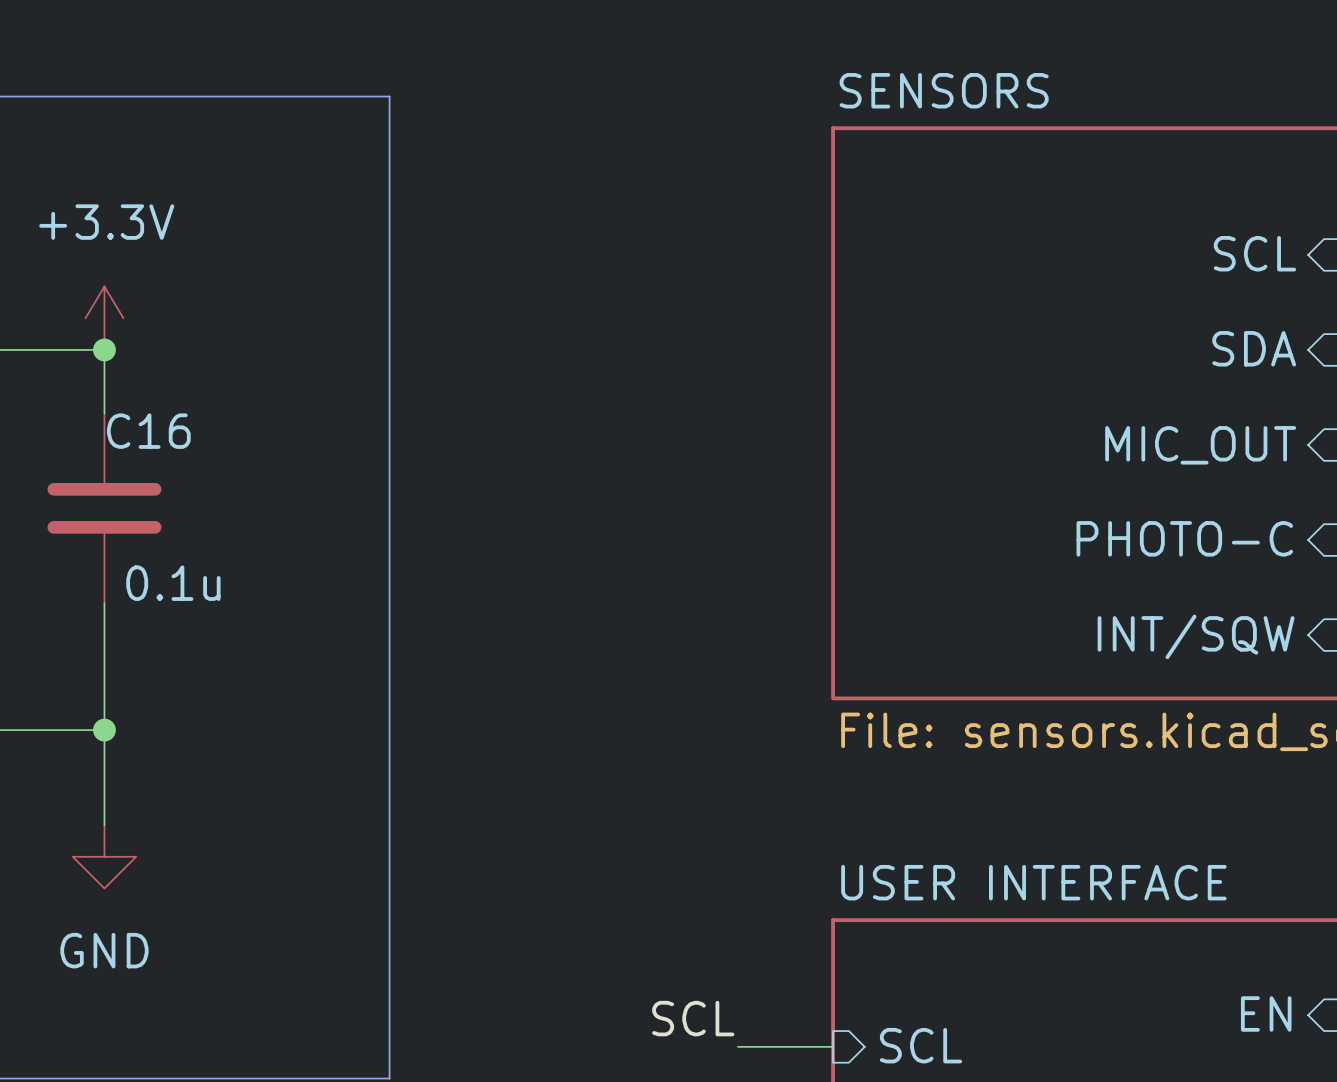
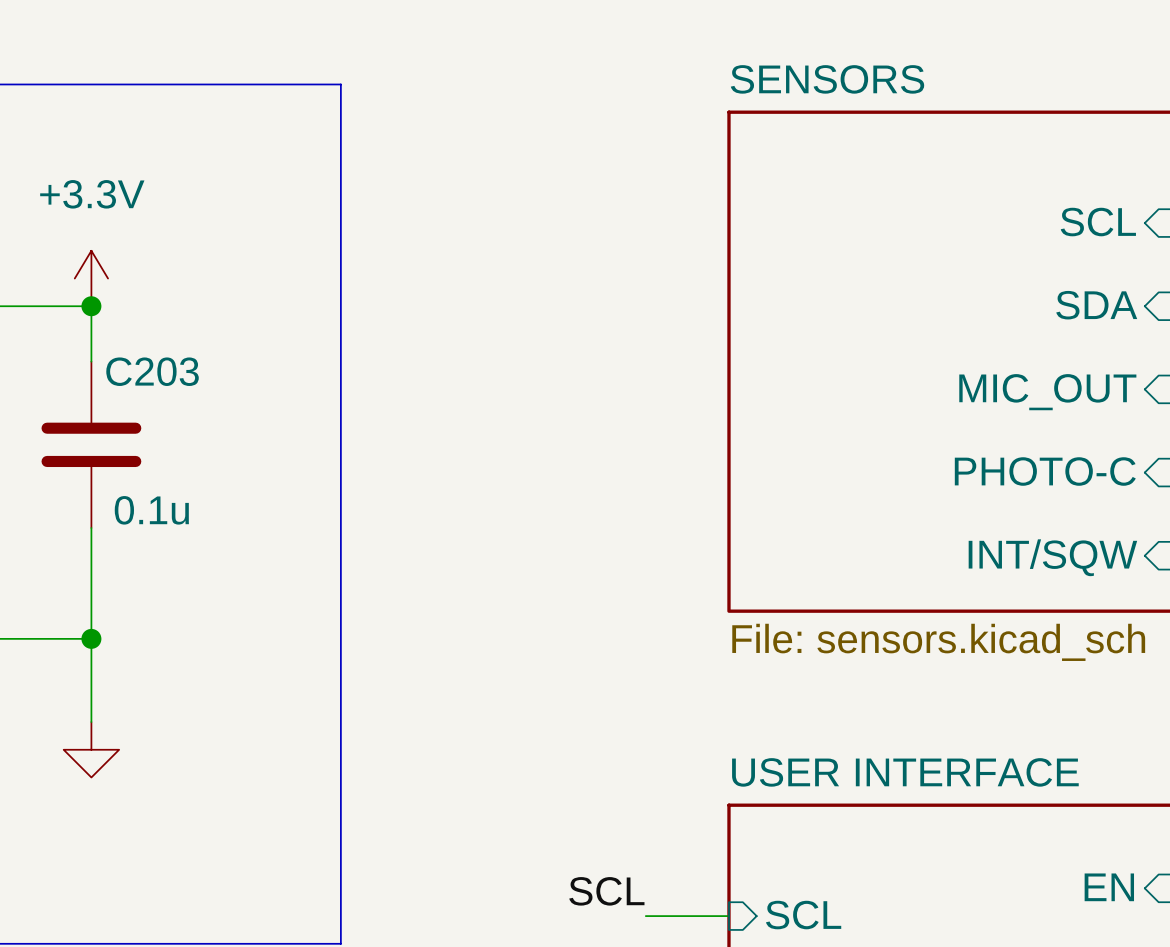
C16 name: C16 (148, 431) -> C203 (152, 371)
power symbol text: GND (104, 950) -> none

